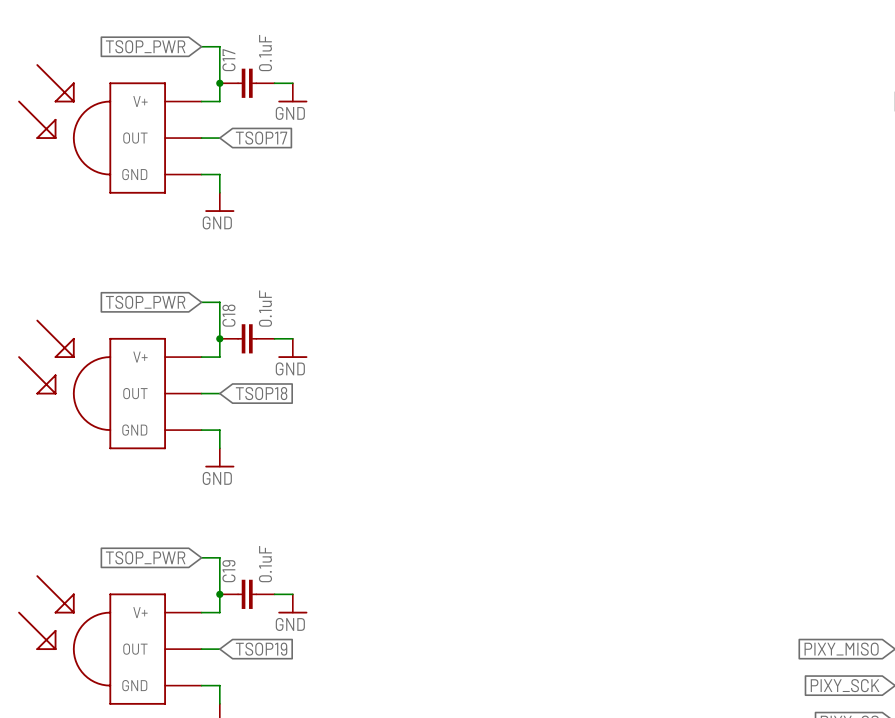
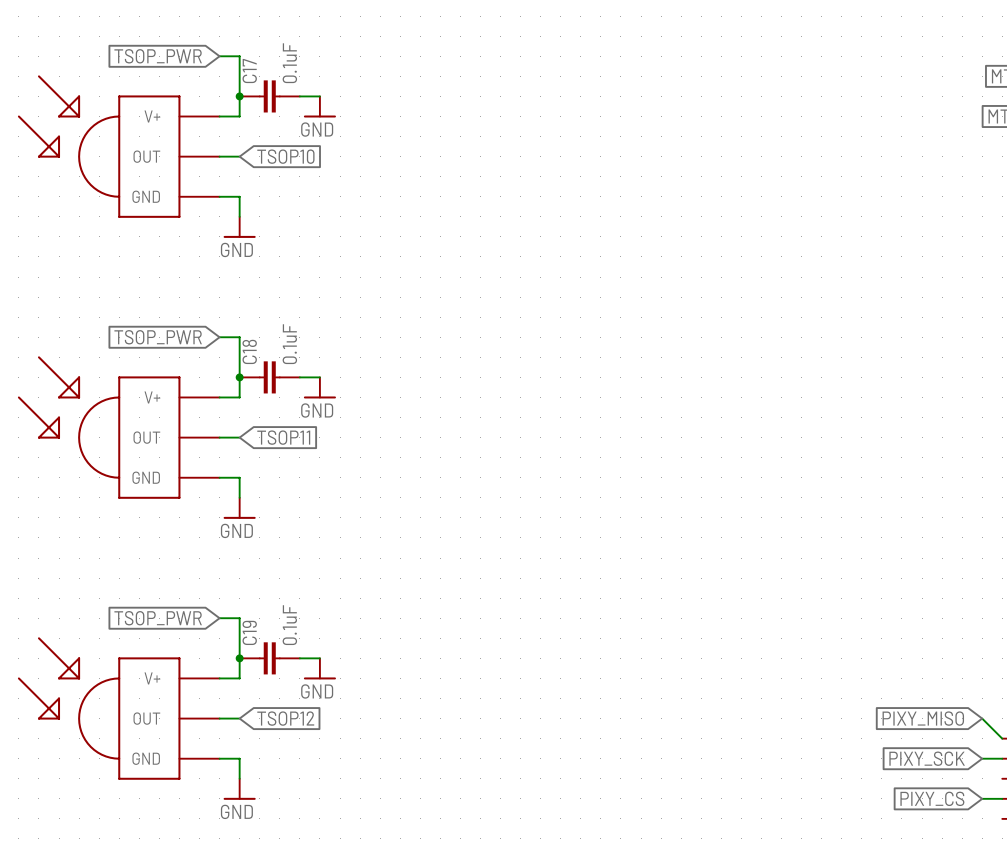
global label: TSOP17 (261, 138) -> TSOP10 (285, 156)
global label: TSOP18 (261, 393) -> TSOP11 (283, 437)
global label: TSOP19 (261, 649) -> TSOP12 (285, 718)

